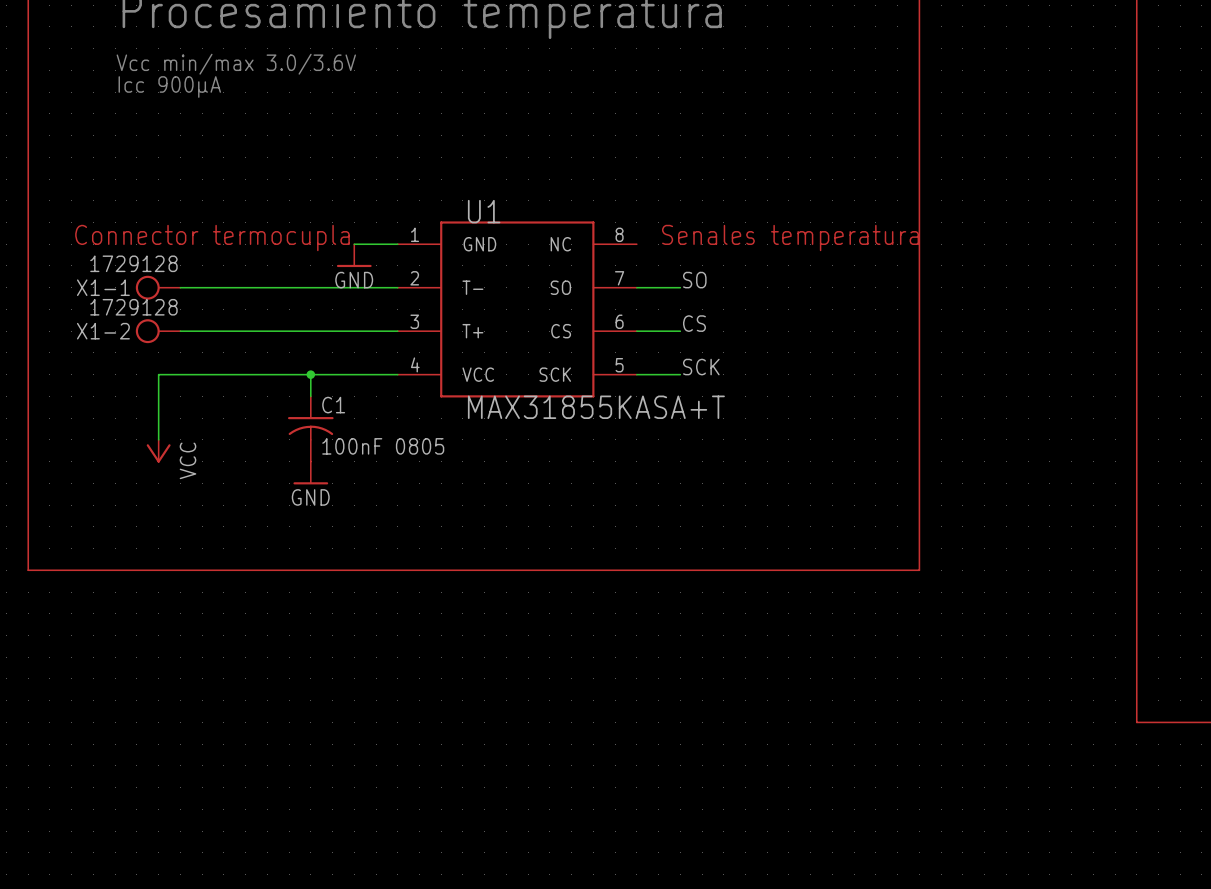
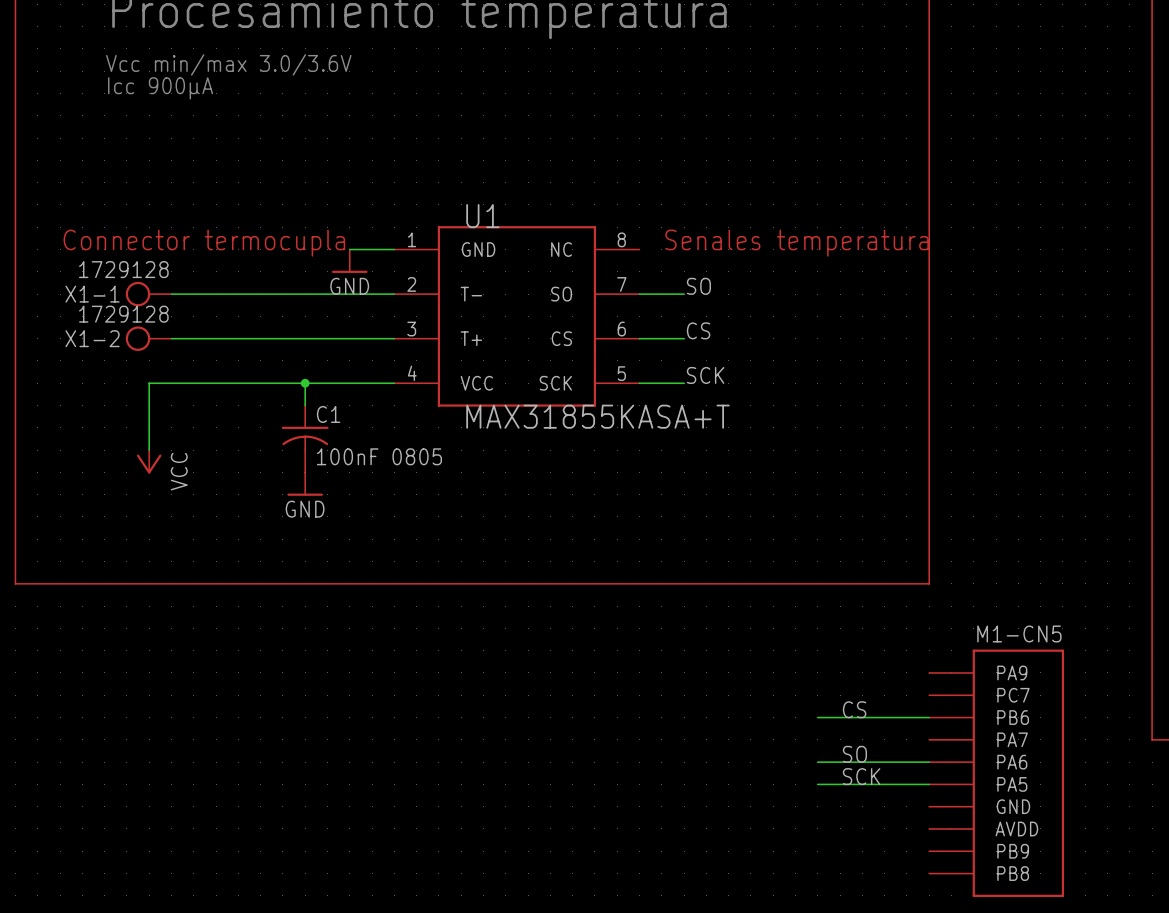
label: none -> CS (854, 709)
wire: none -> (817, 717) (929, 717)
label: none -> SO (854, 754)
wire: none -> (817, 762) (929, 762)
M1-CN5: none -> (996, 773)
label: none -> SCK (861, 776)
wire: none -> (817, 784) (929, 784)

